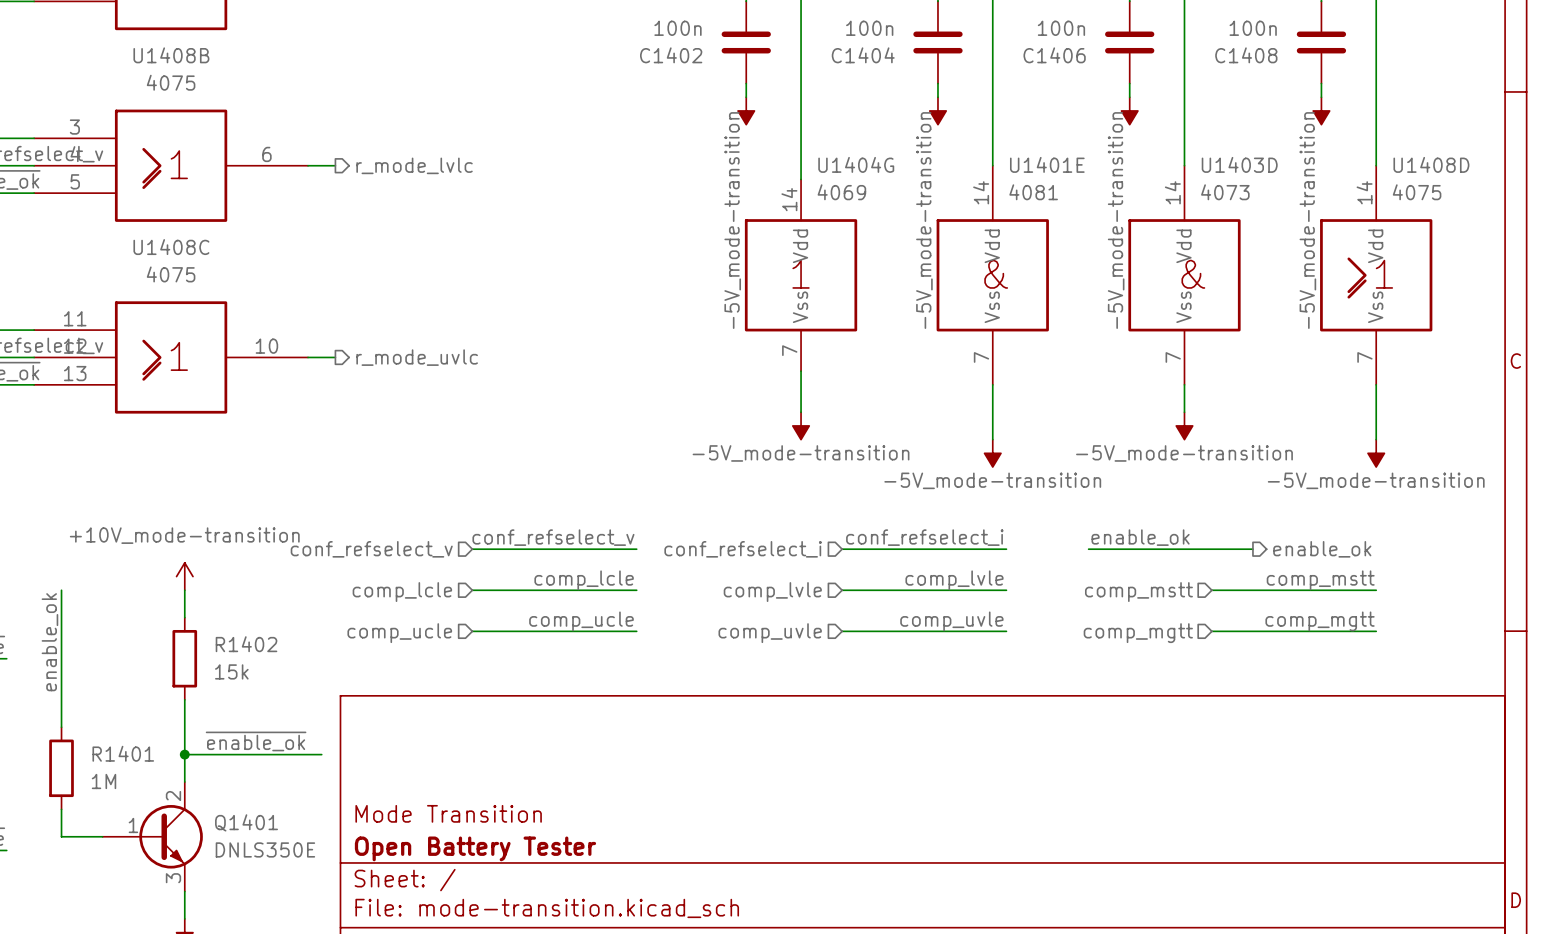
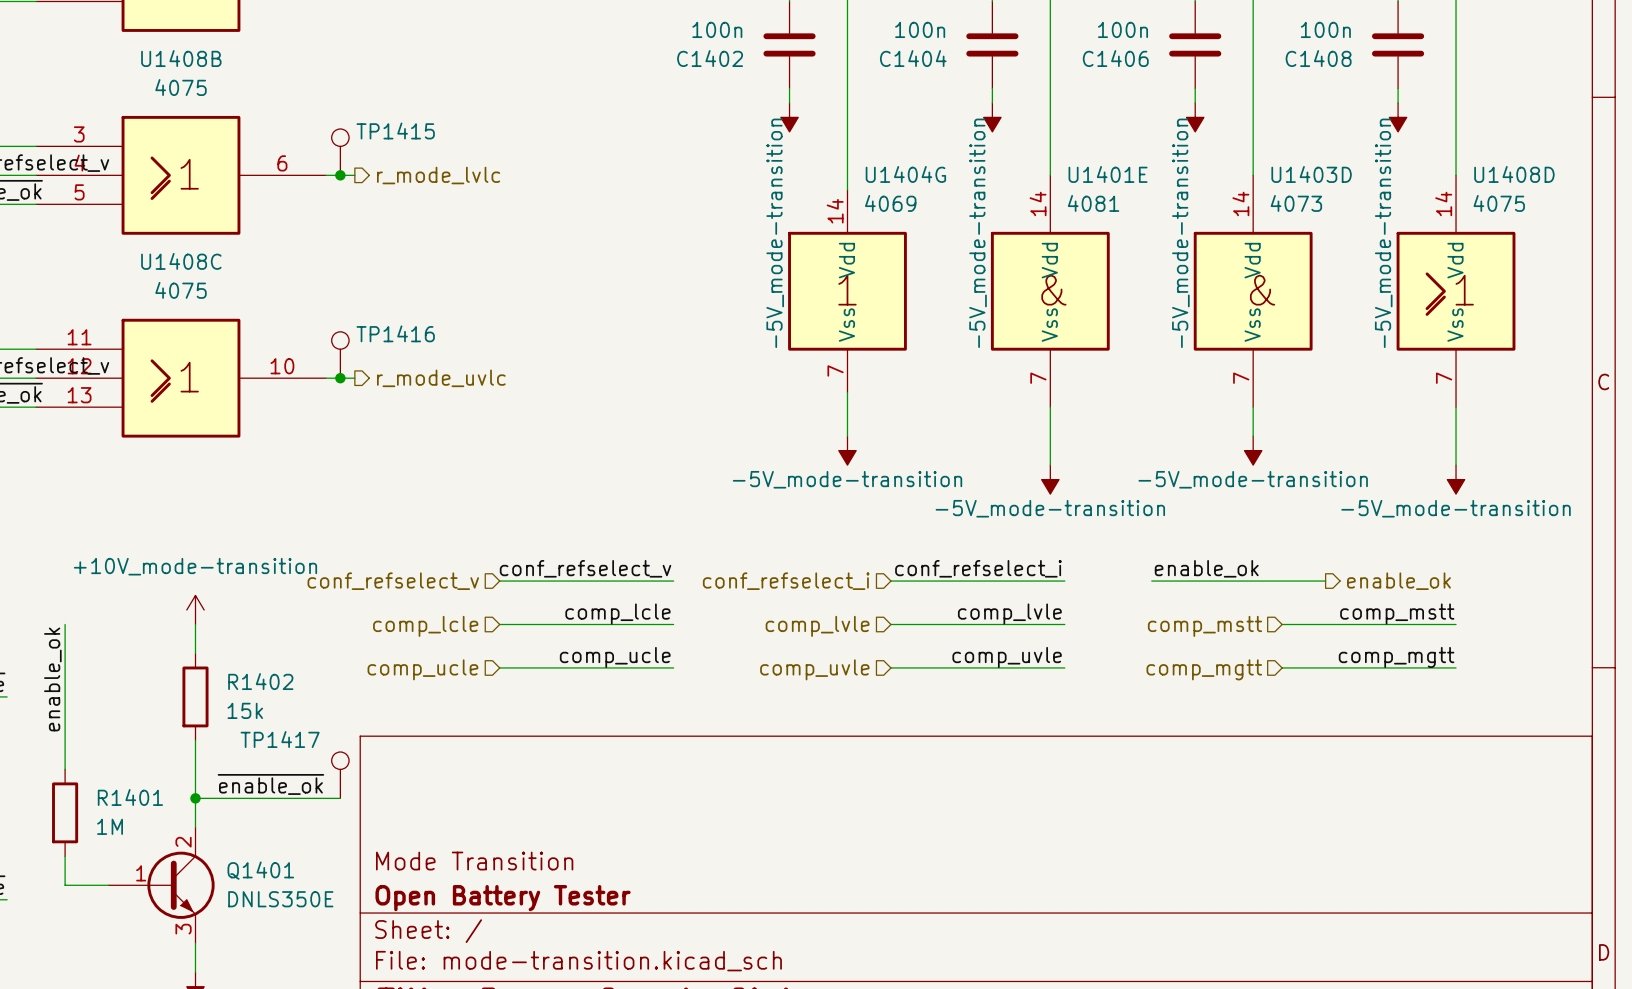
TP1415: none -> (340, 152)
junction: none -> (340, 175)
TP1416: none -> (340, 355)
junction: none -> (340, 378)
TP1417: none -> (340, 775)

